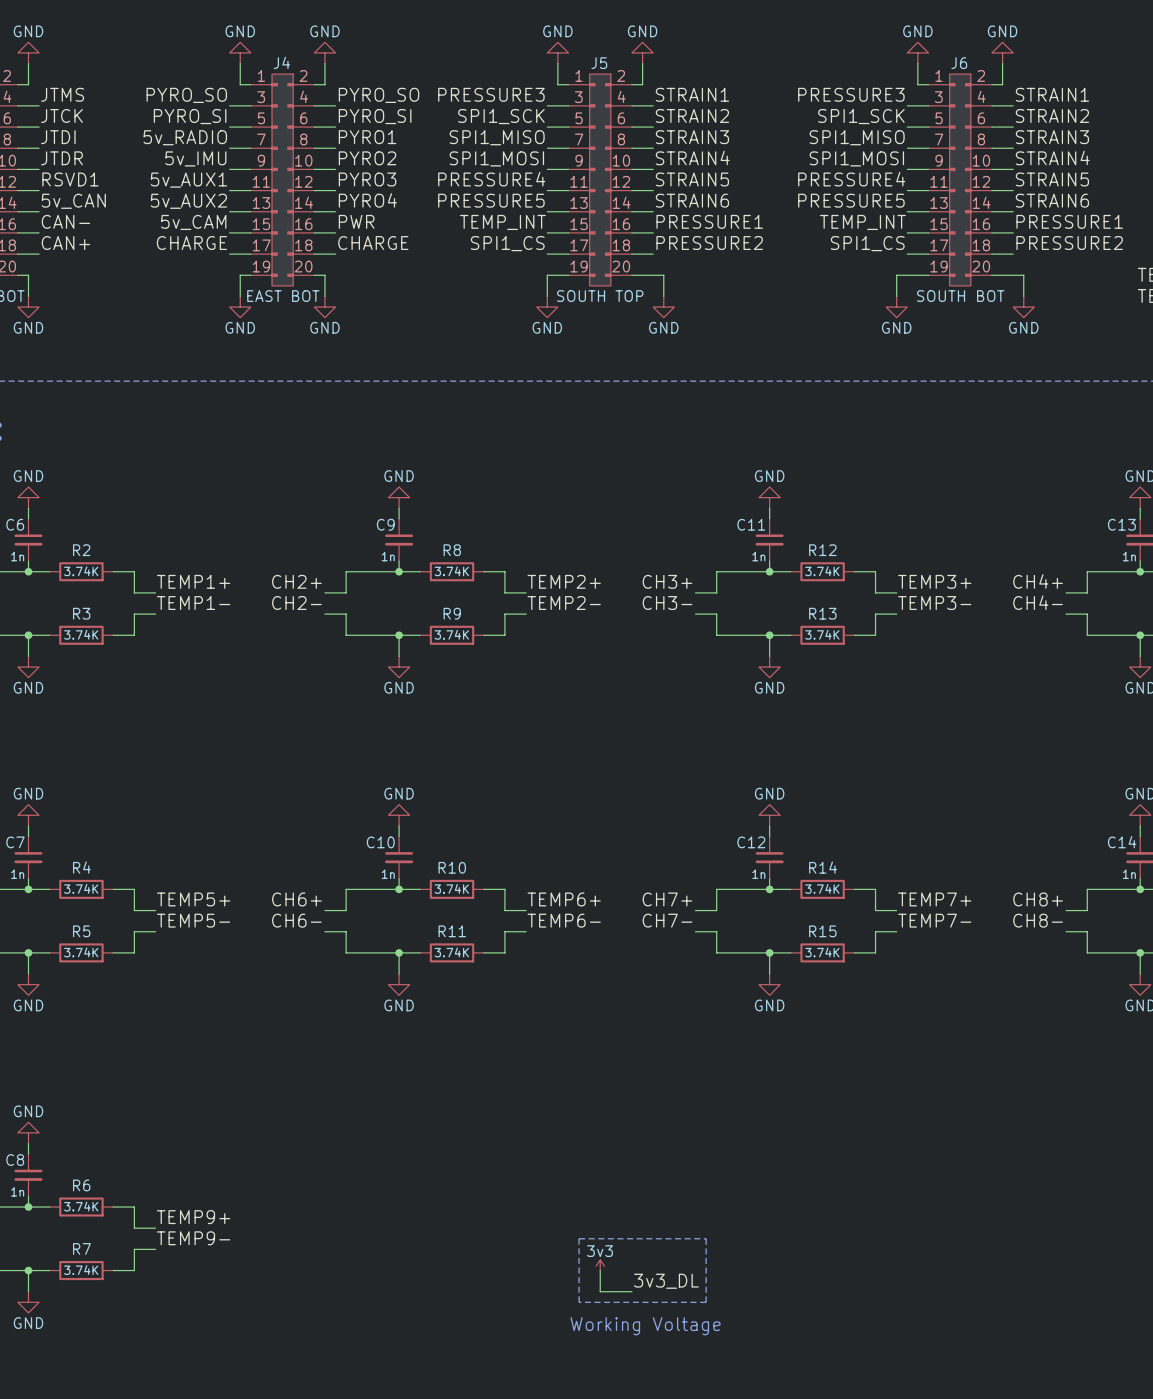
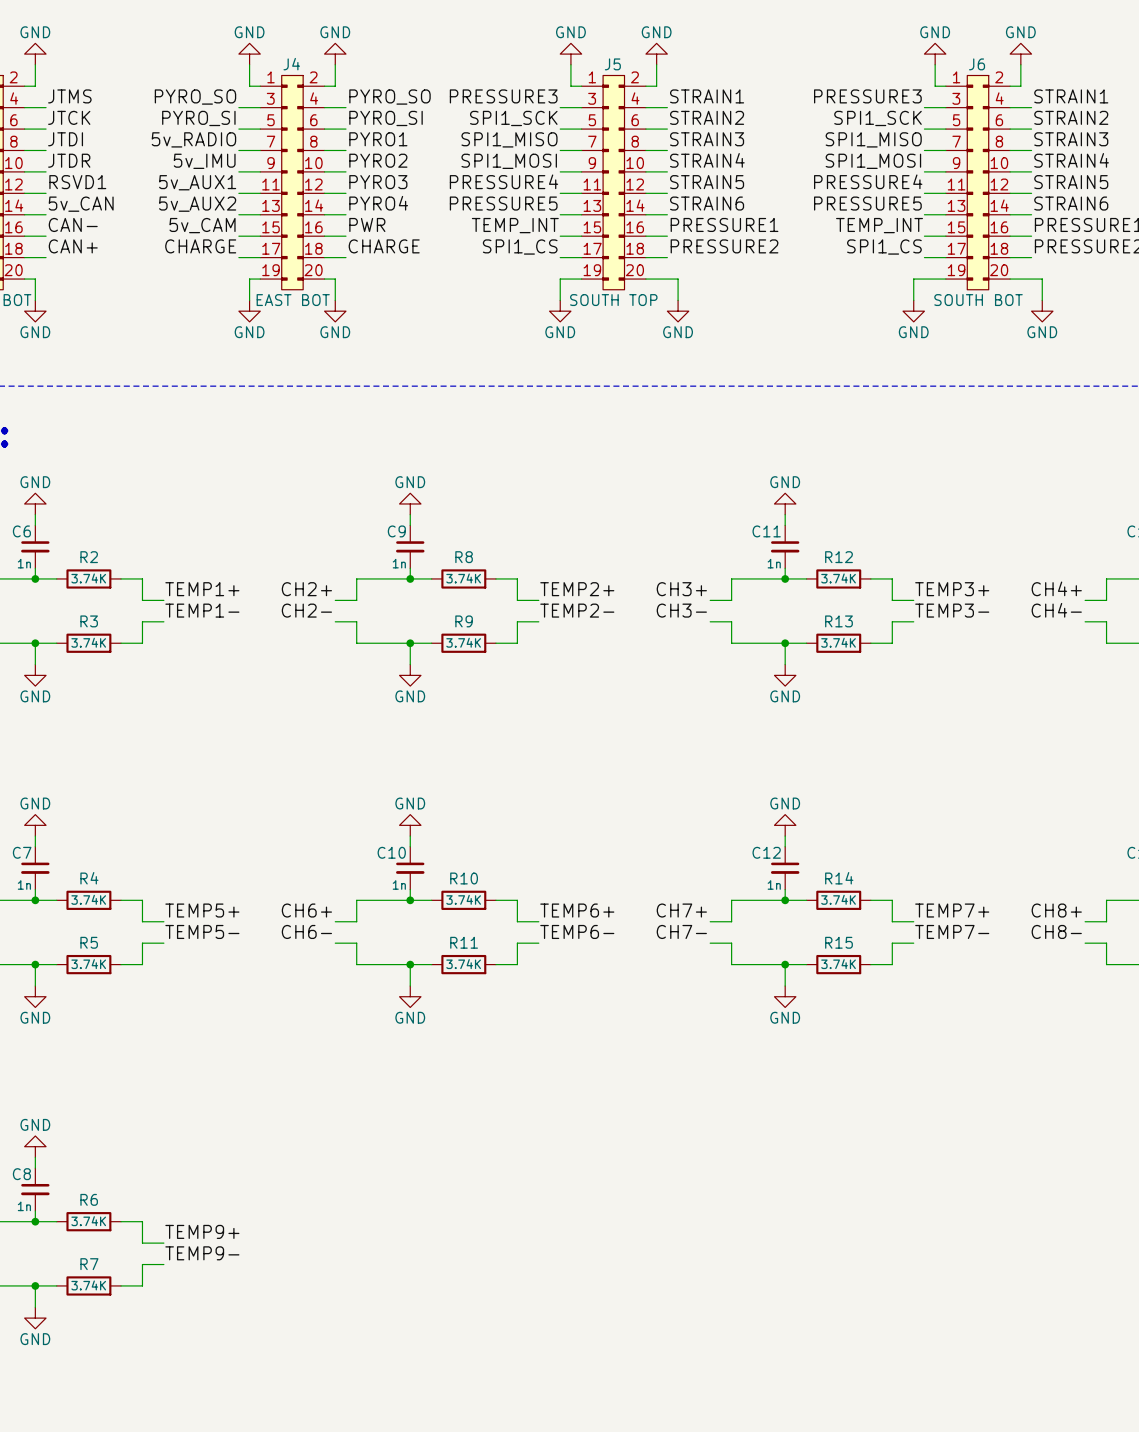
line: (579, 1238) (706, 1238) (706, 1302) (579, 1302) (579, 1238) -> none
power symbol: 3v3 (600, 1265) -> none
wire: (600, 1270) (600, 1291) (632, 1291) -> none
label: 3v3_DL (666, 1281) -> none
text: Working Voltage (645, 1326) -> none

